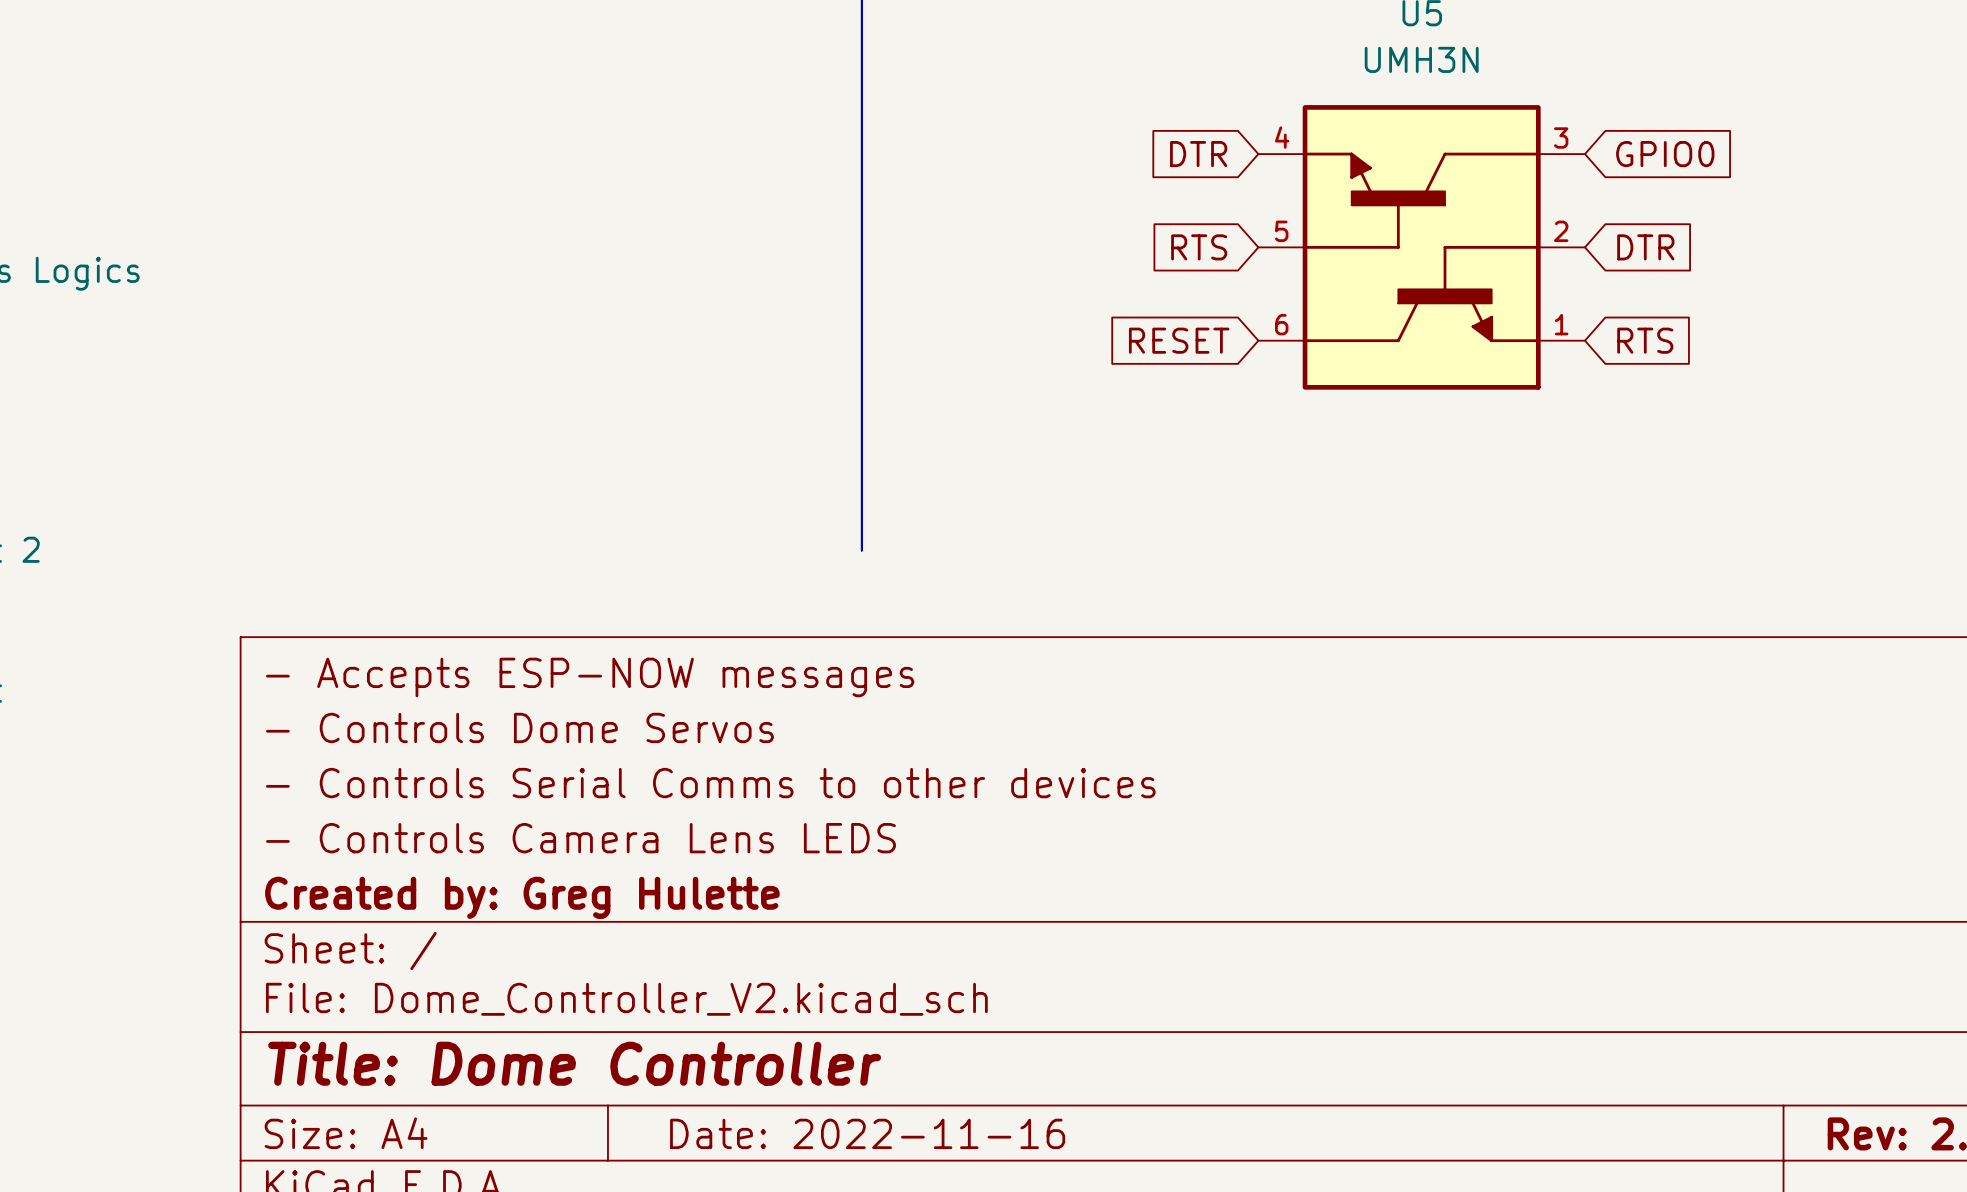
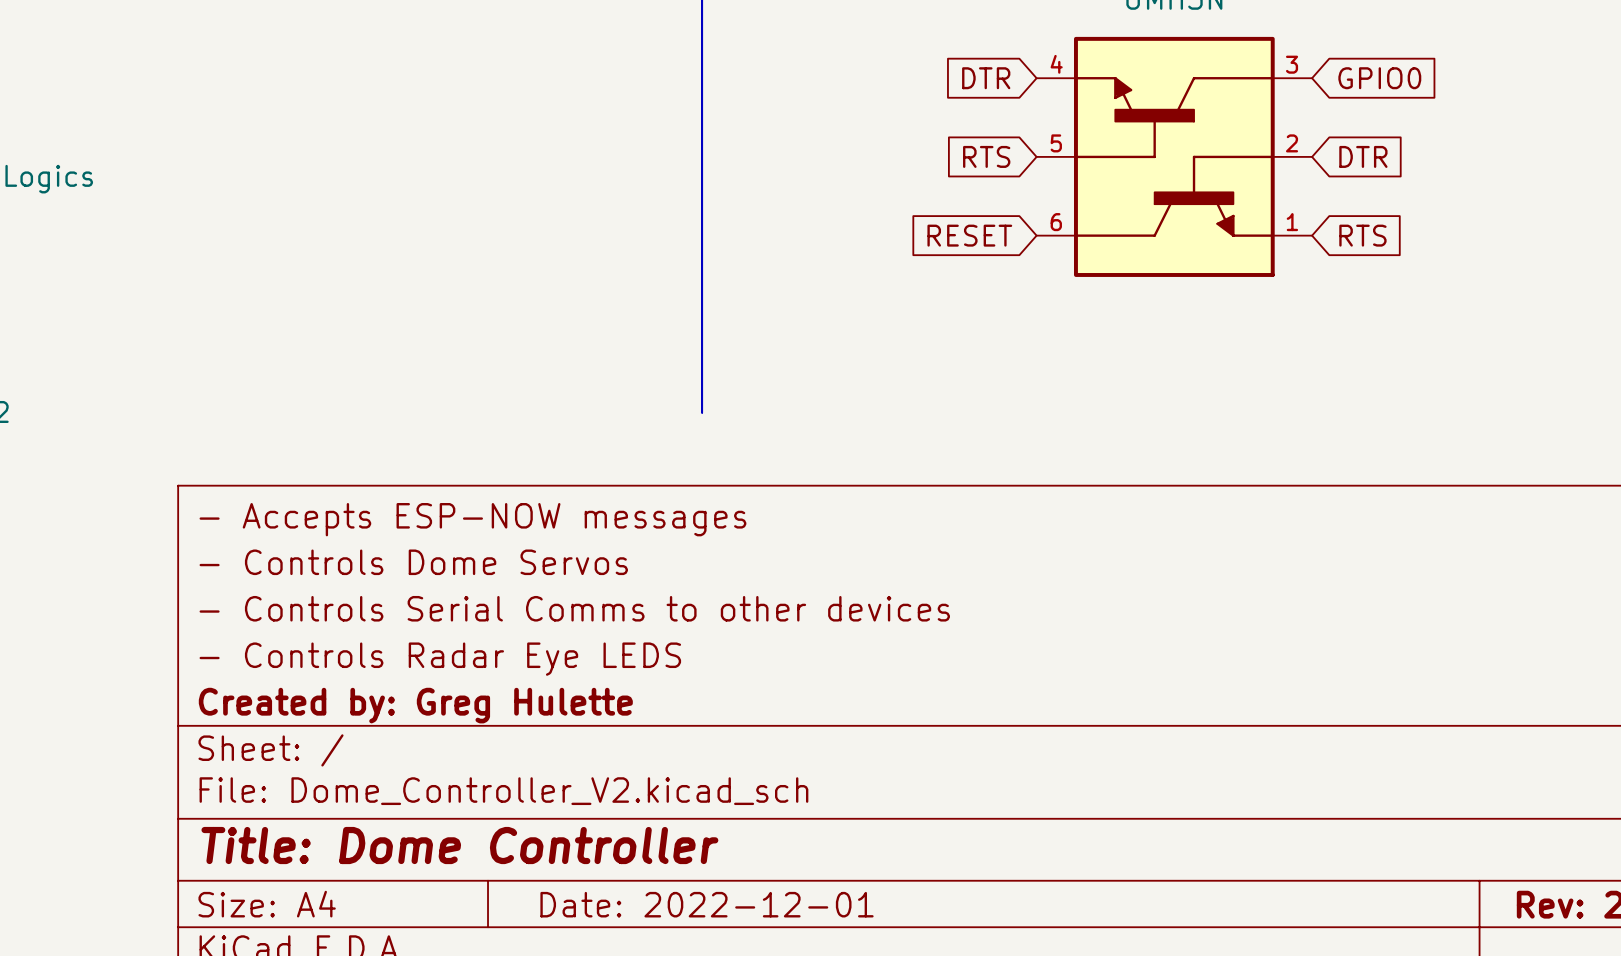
title block: - Controls Camera Lens LEDS (580, 838) -> - Controls Radar Eye LEDS (440, 659)
title block: Date: 2022-11-16 (867, 1133) -> Date: 2022-12-01 (707, 904)

